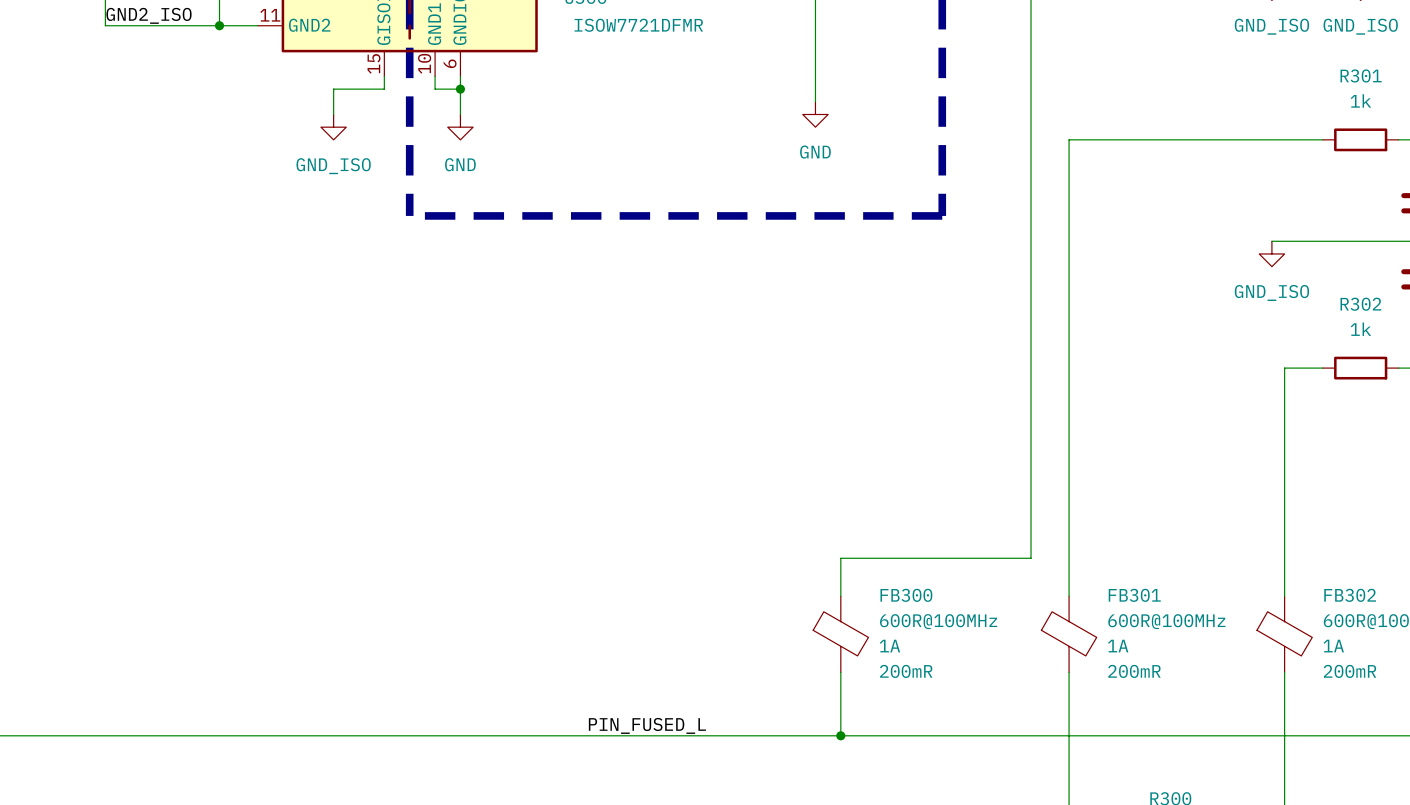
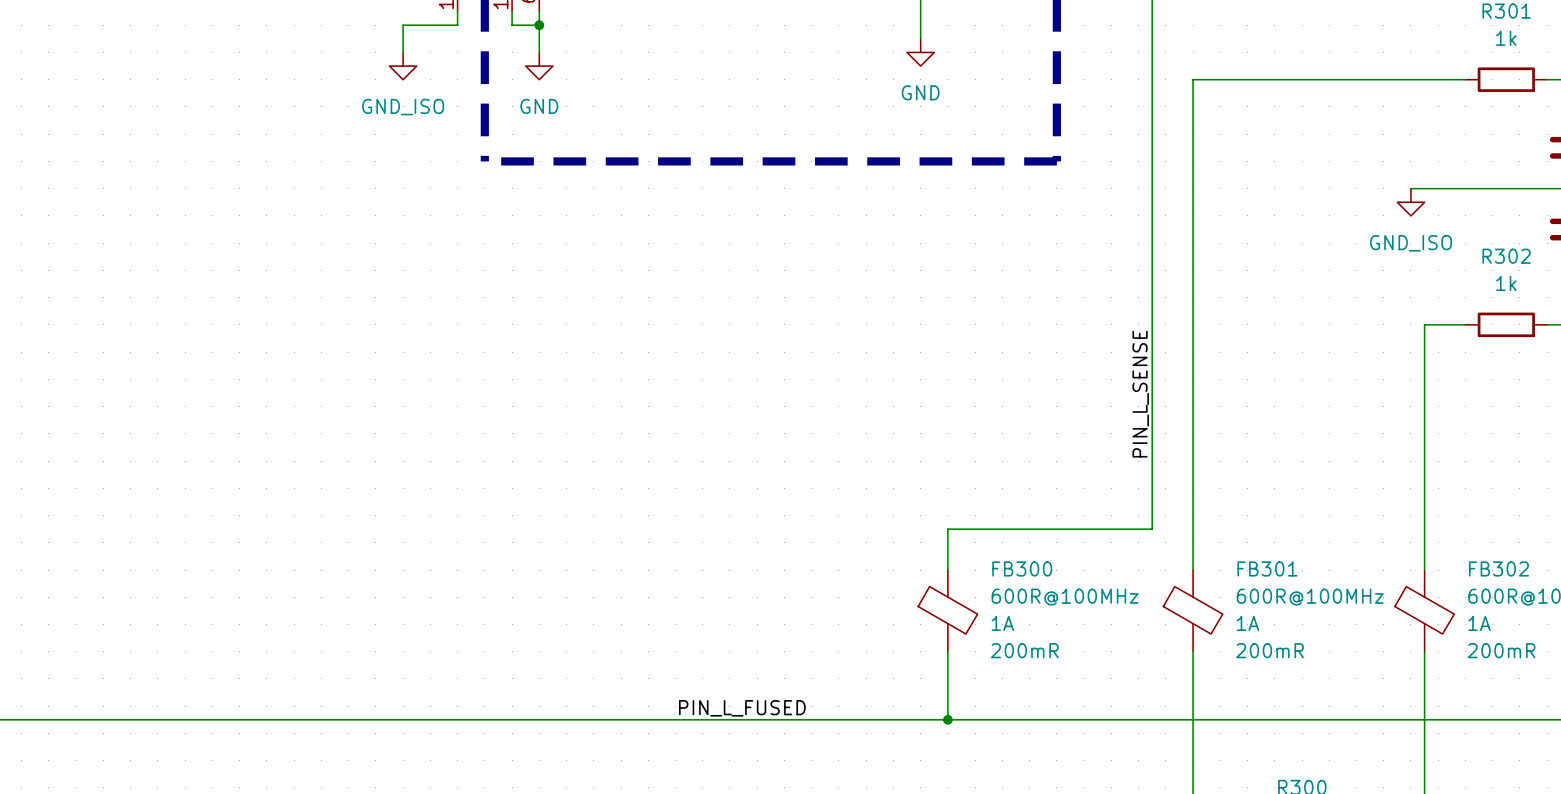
label: none -> PIN_L_SENSE (1140, 394)
label: PIN_FUSED_L (647, 725) -> PIN_L_FUSED (742, 708)

